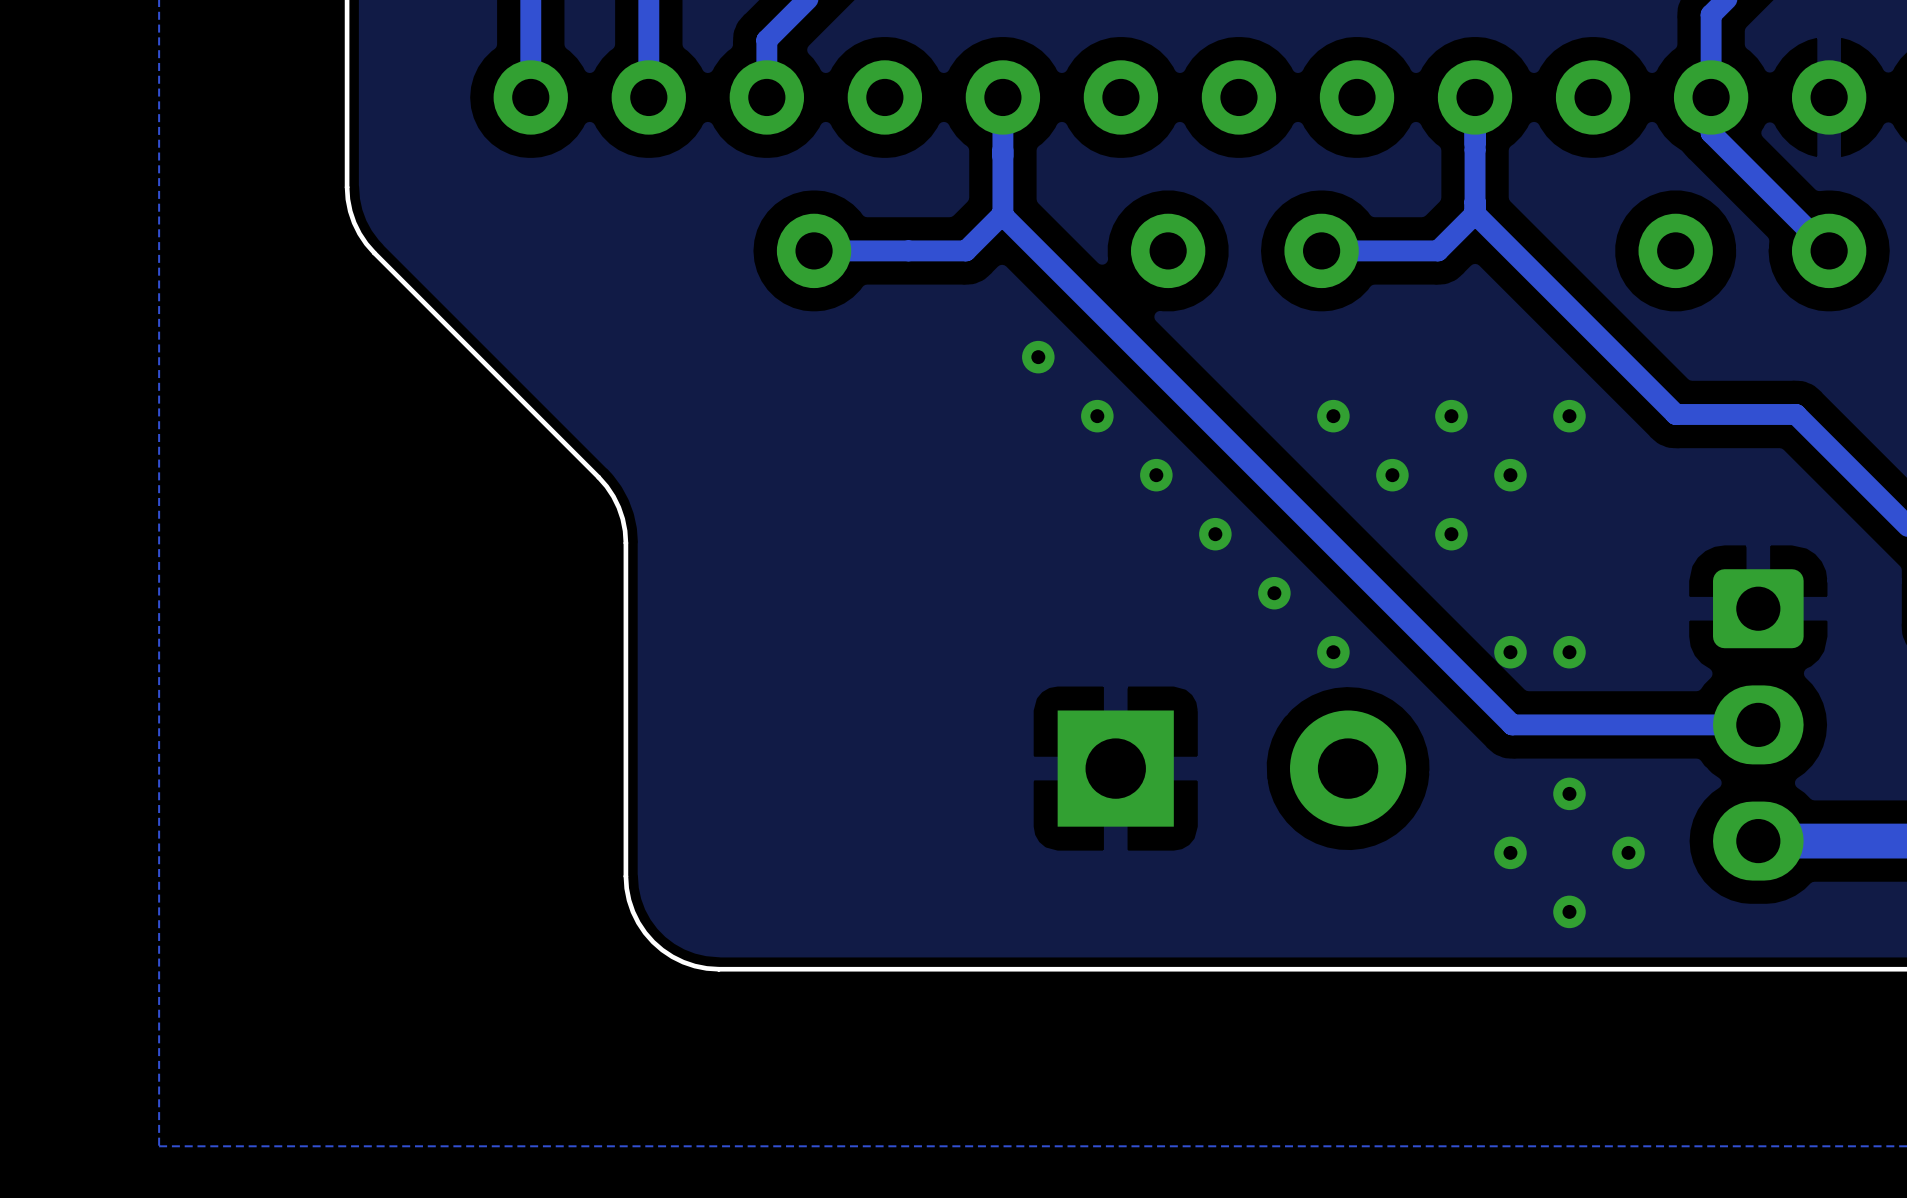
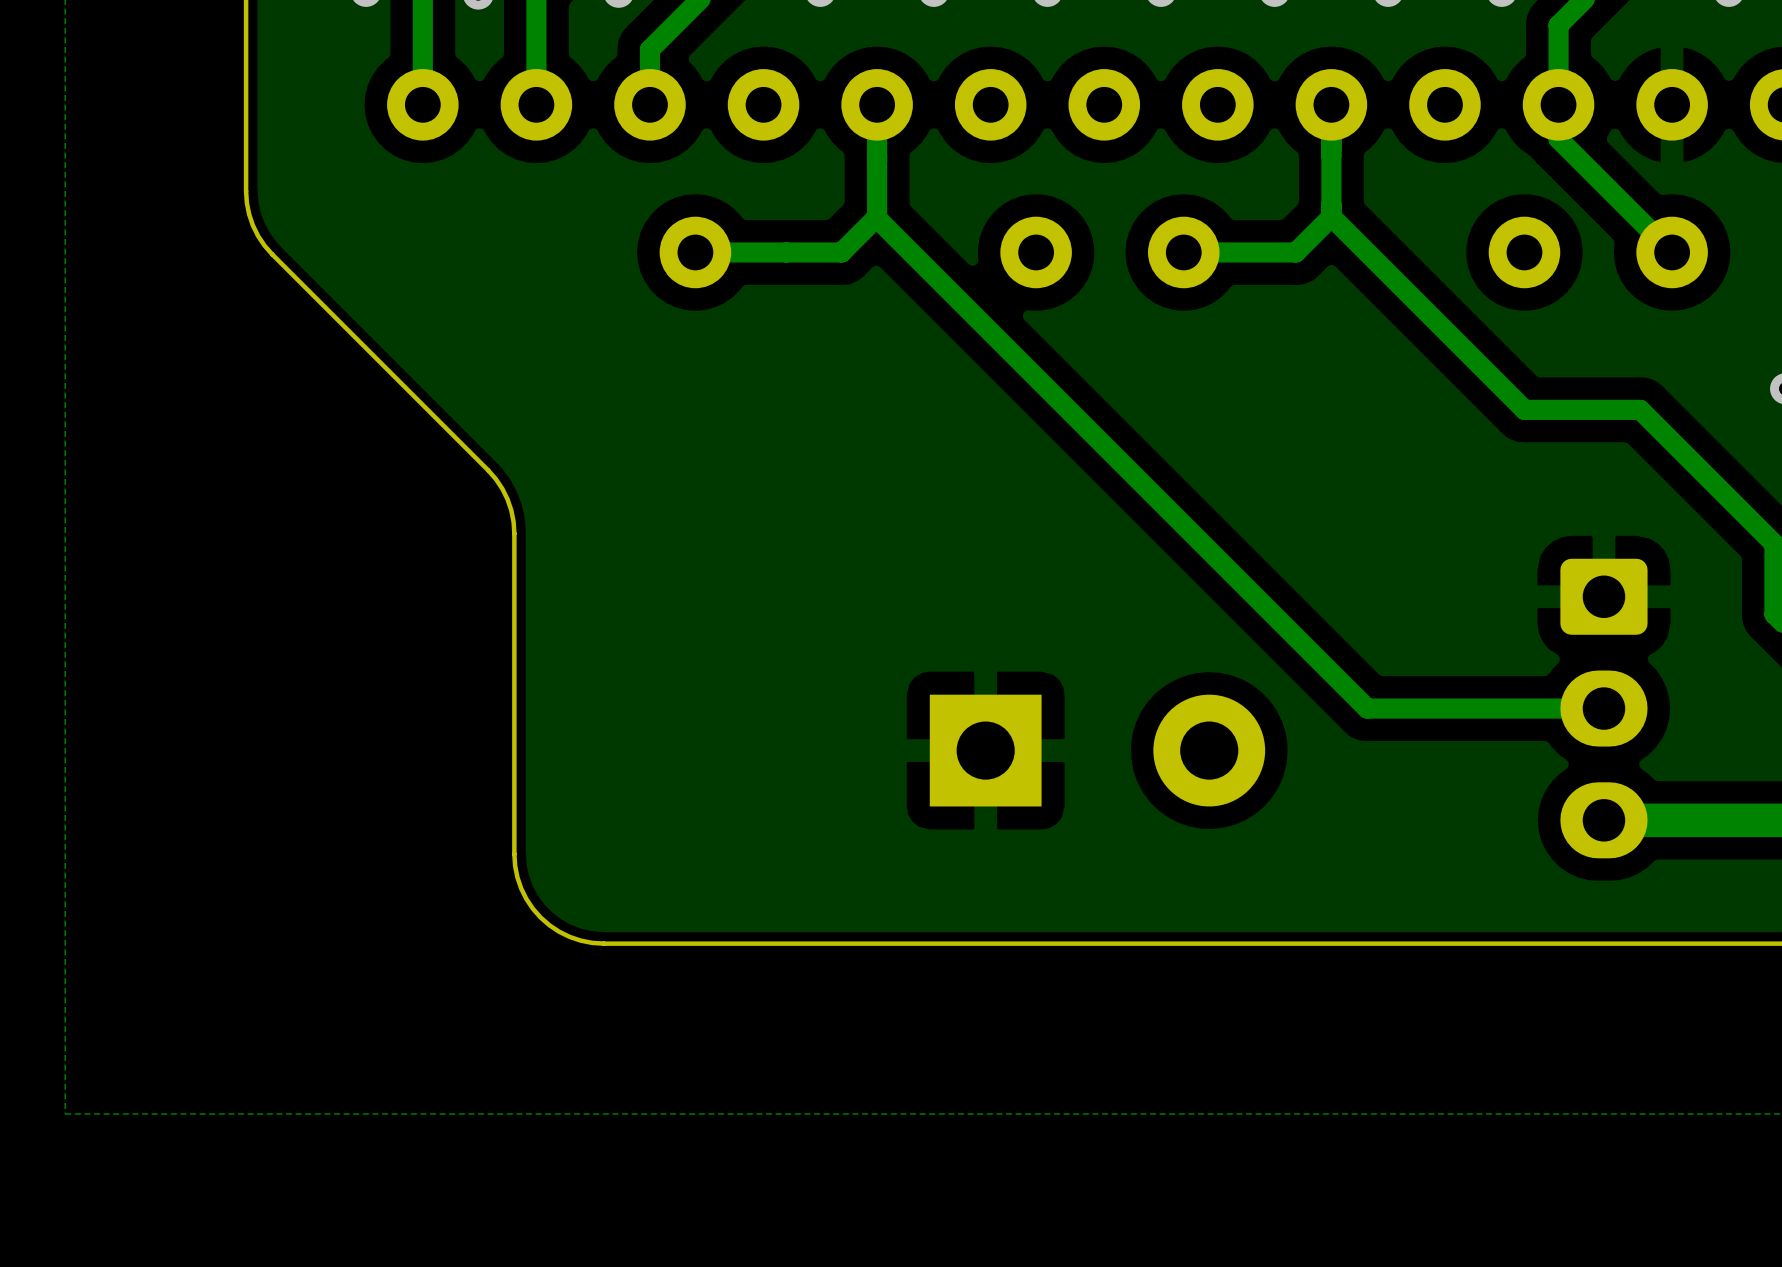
via: (1038, 357) -> none
via: (1097, 416) -> none
via: (1333, 416) -> none
via: (1451, 416) -> none
via: (1569, 416) -> none
via: (1156, 475) -> none
via: (1392, 475) -> none
via: (1510, 475) -> none
via: (1215, 534) -> none
via: (1451, 534) -> none
via: (1274, 593) -> none
via: (1333, 652) -> none
via: (1510, 652) -> none
via: (1569, 652) -> none
via: (1569, 793) -> none
via: (1510, 852) -> none
via: (1628, 852) -> none
via: (1569, 911) -> none

